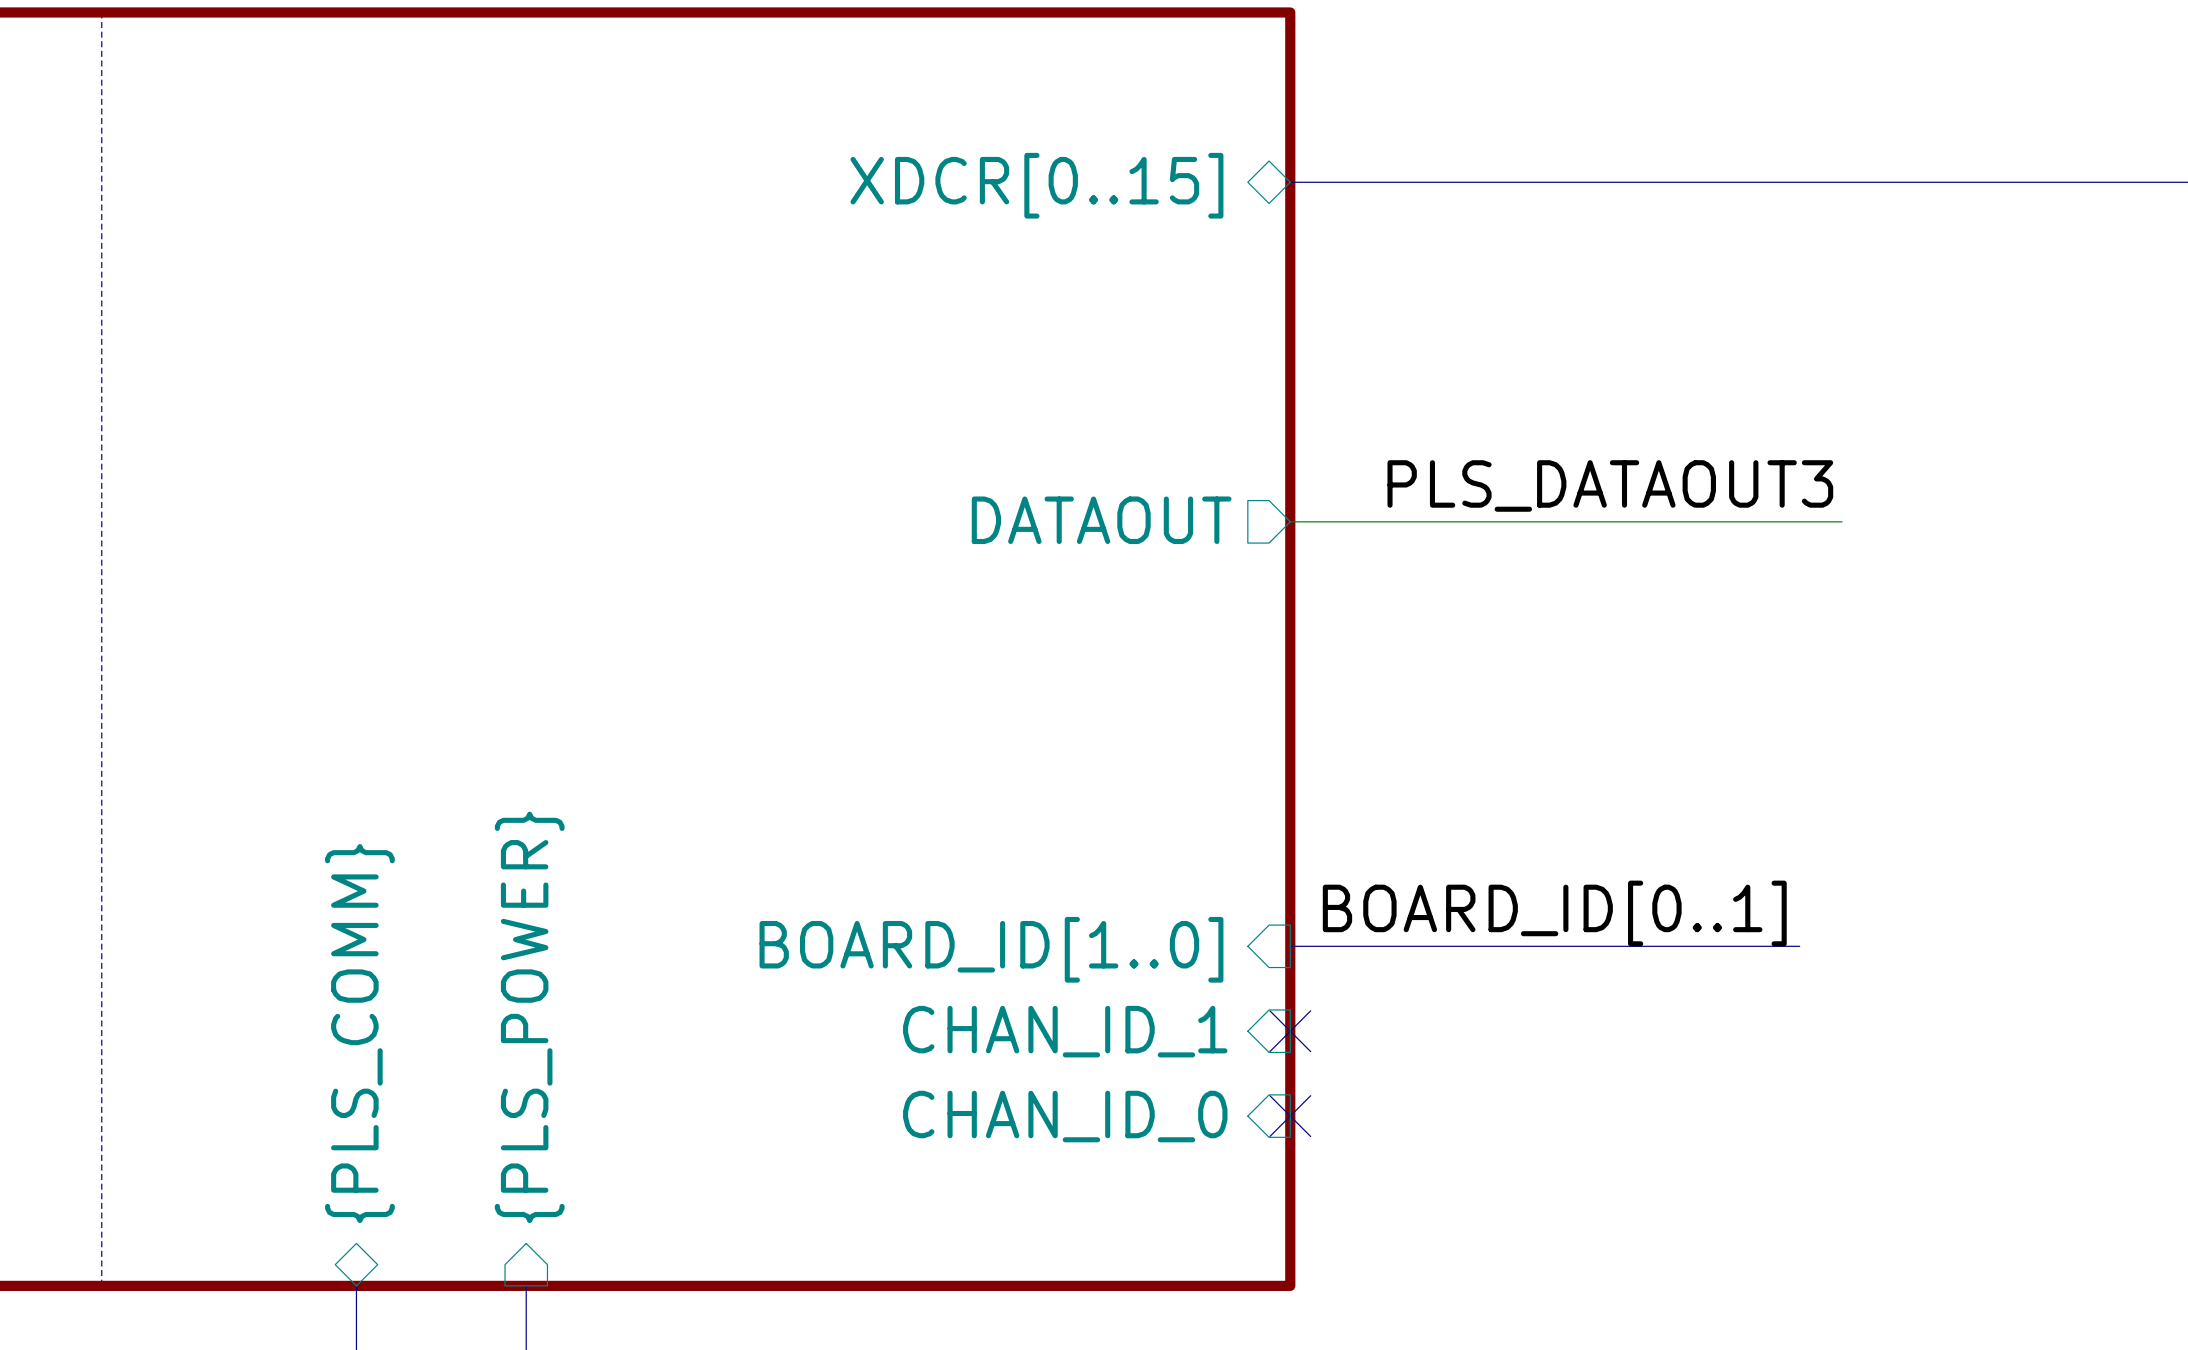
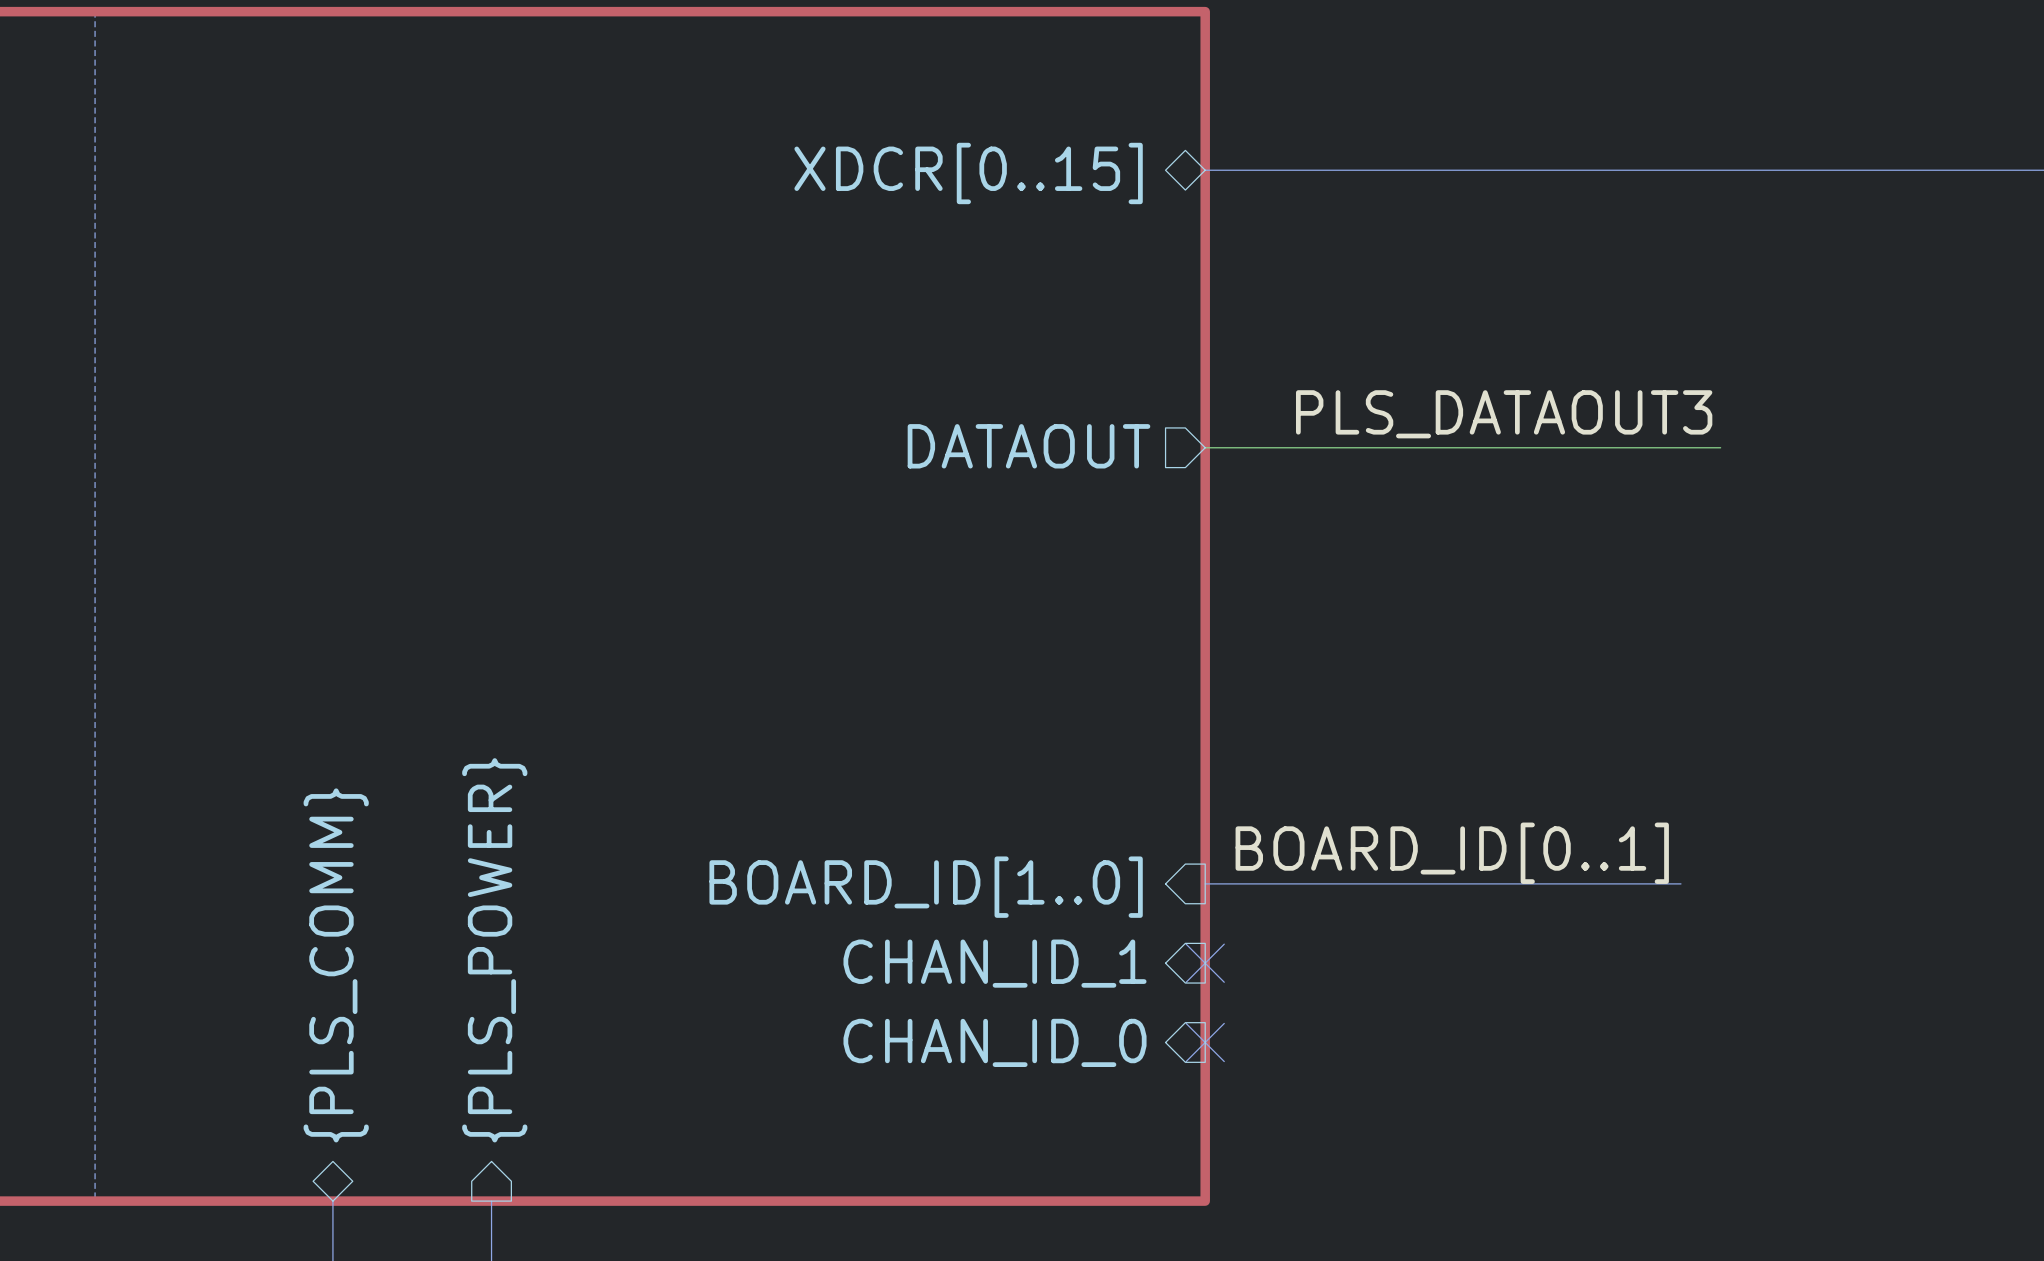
label position: PLS_DATAOUT3 (1610, 485) -> PLS_DATAOUT3 (1504, 414)
sheet pin position: DATAOUT (1101, 520) -> DATAOUT (1029, 446)
wire: (1290, 521) (1842, 521) -> (1205, 447) (1720, 447)

